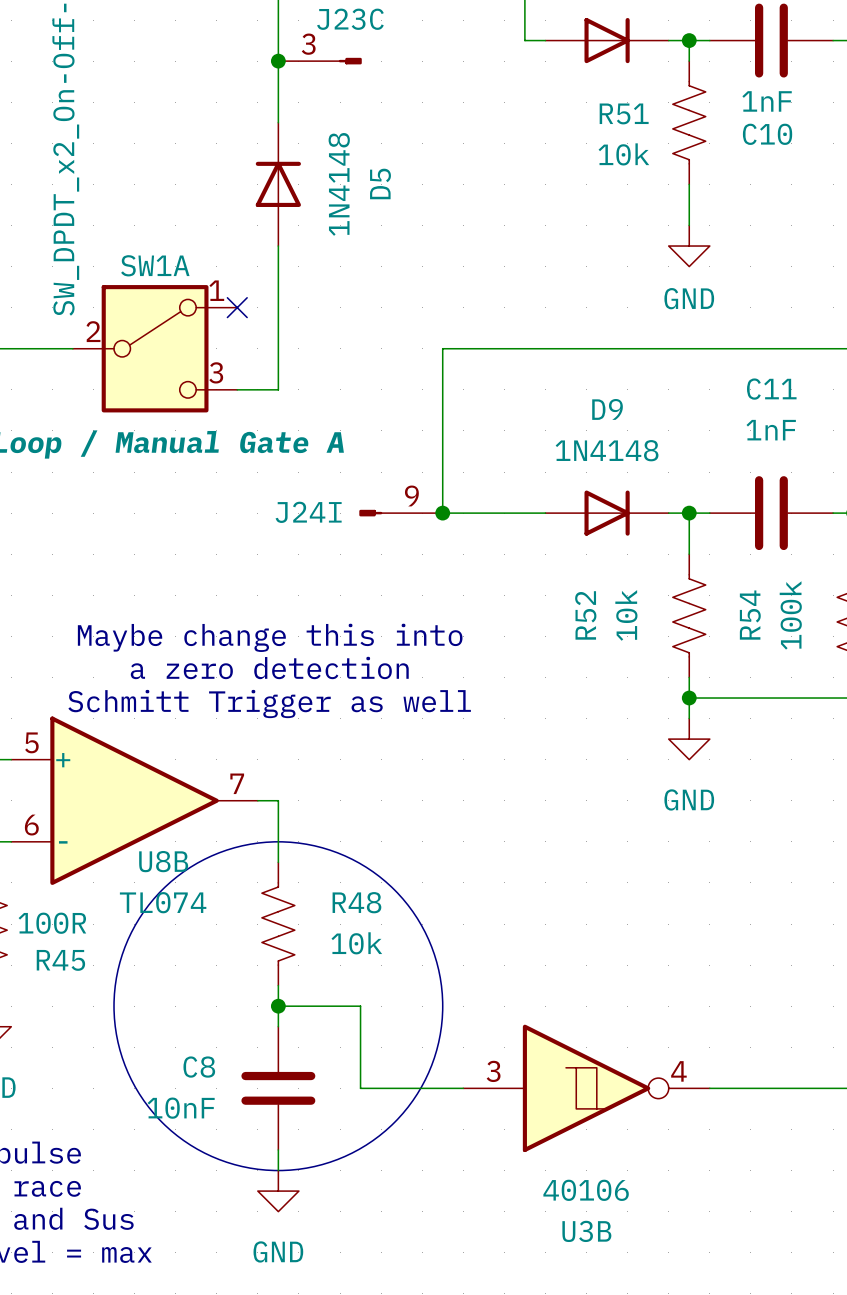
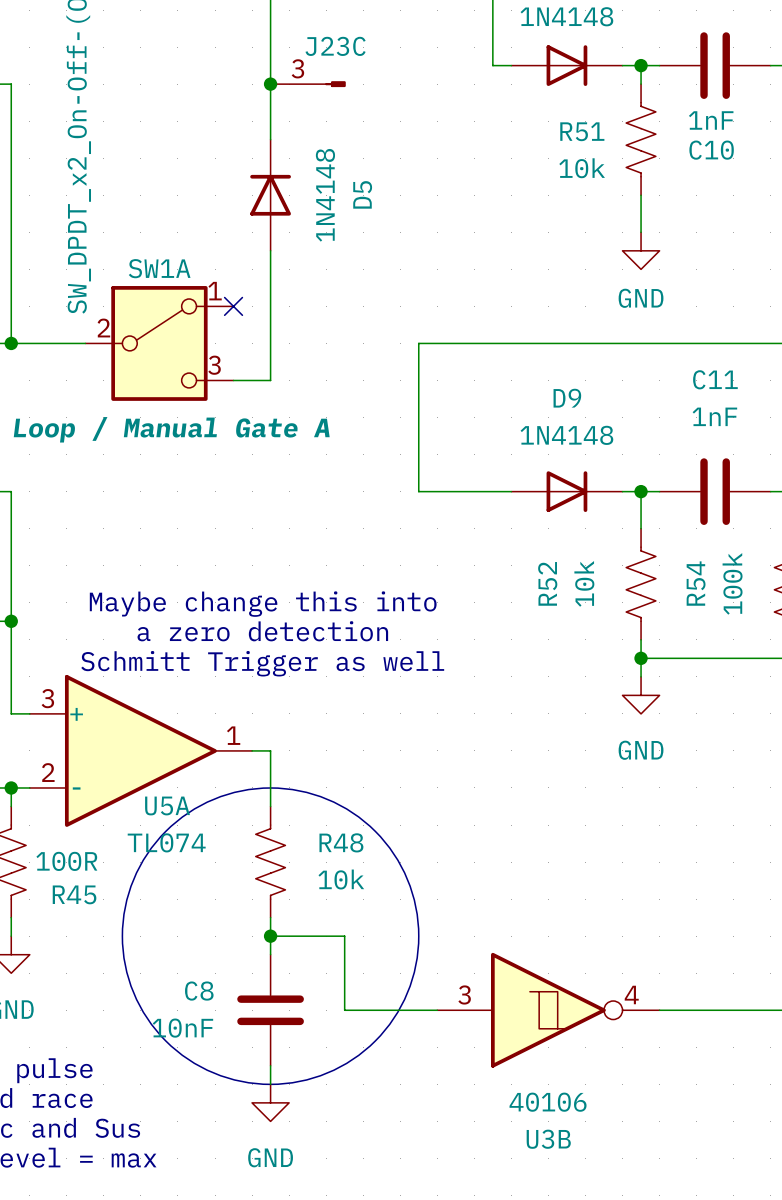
J24I: (401, 513) -> none
junction: (442, 513) -> none
U8B pin number: 5 (31, 742) -> 3 (47, 698)
U8B pin number: 7 (237, 783) -> 1 (233, 735)
U8B pin number: 6 (31, 825) -> 2 (48, 772)
U8B name: U8B (163, 861) -> U5A (167, 805)

